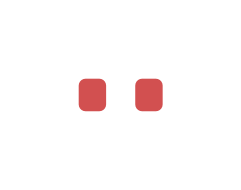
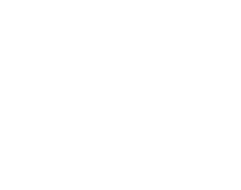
part: (120, 94) -> none

